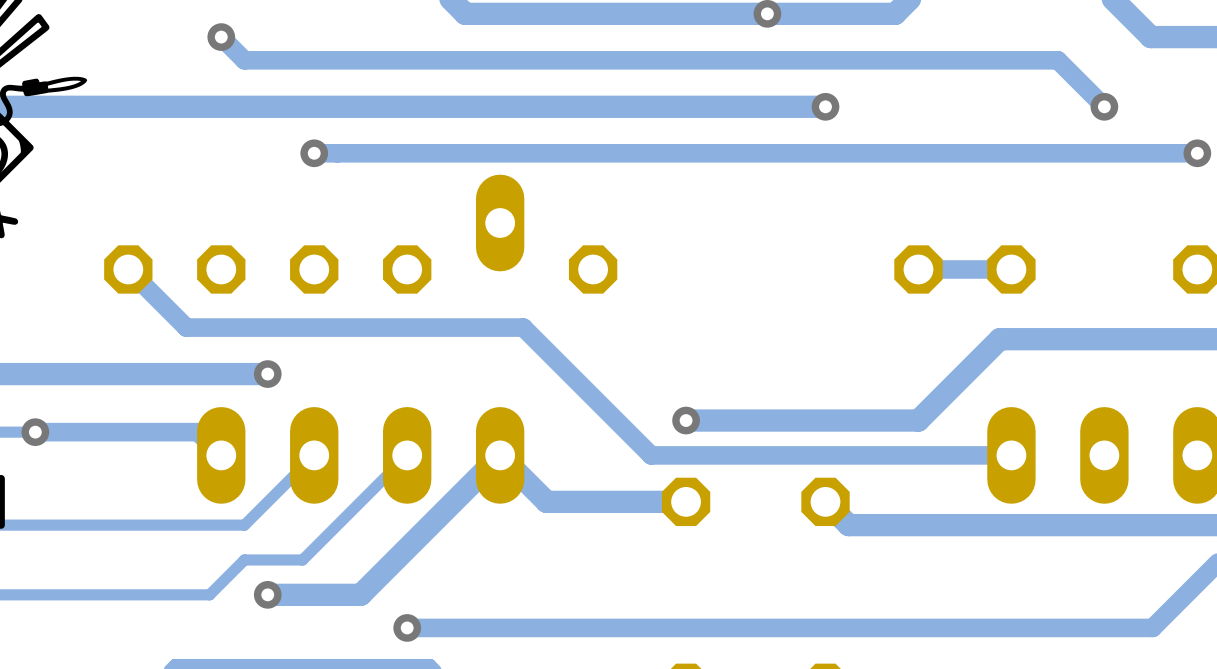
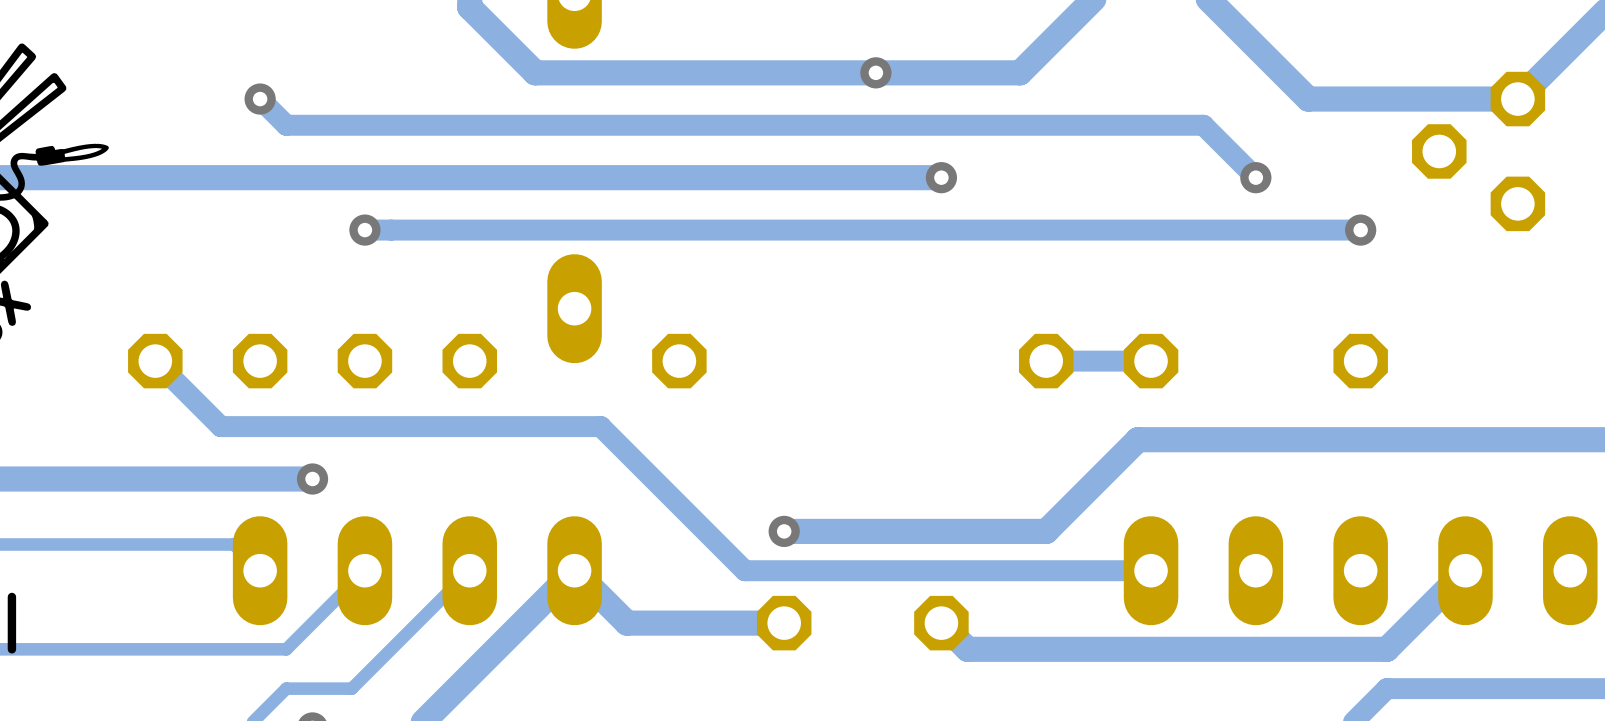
track width: thick (35, 432) (198, 432) (221, 455) -> thin (50, 544) (233, 544) (260, 570)
via: (35, 432) -> none

